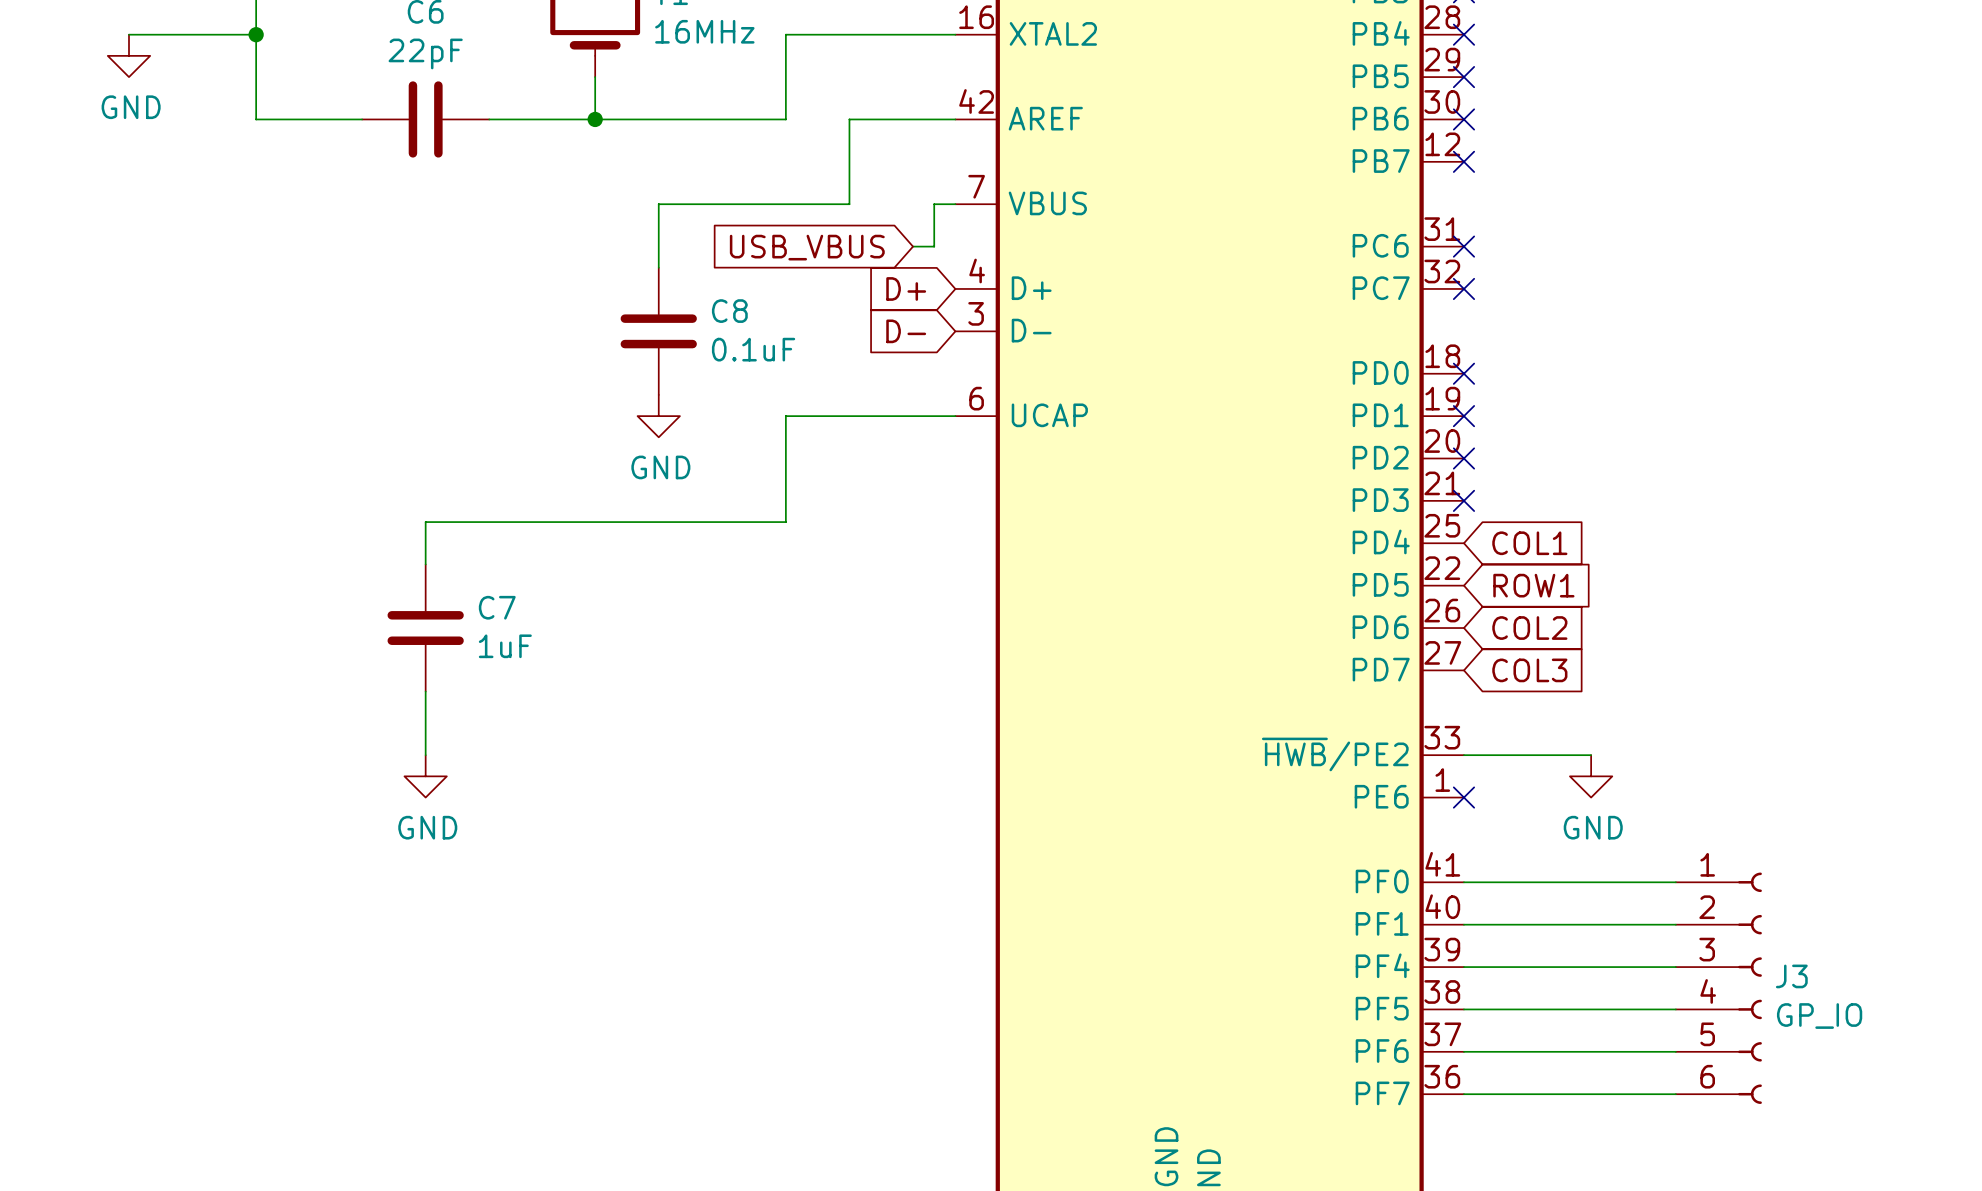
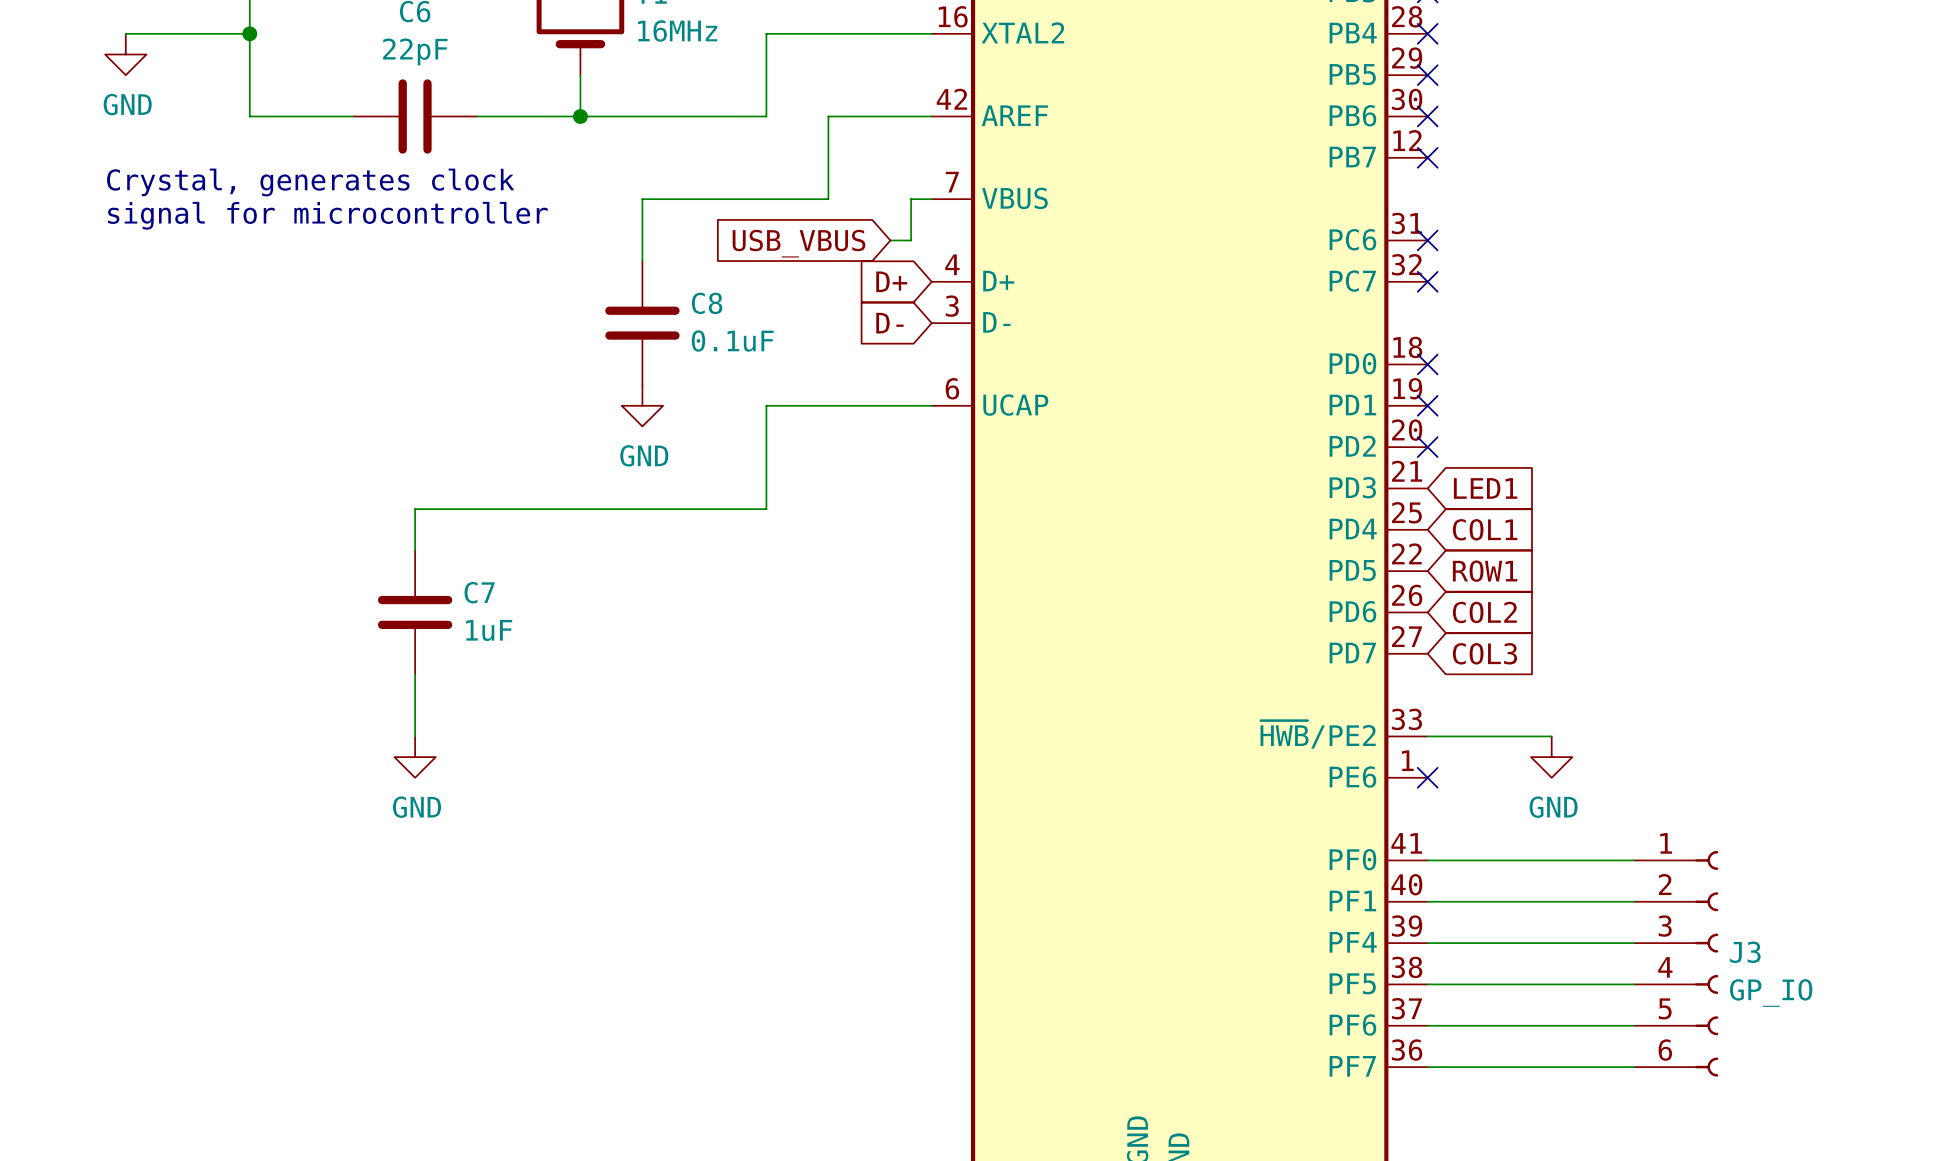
text: none -> Crystal, generates clock (310, 182)
text: none -> signal for microcontroller (327, 215)
no-connect mark: (1463, 500) -> none
global label: none -> LED1 (1485, 488)

